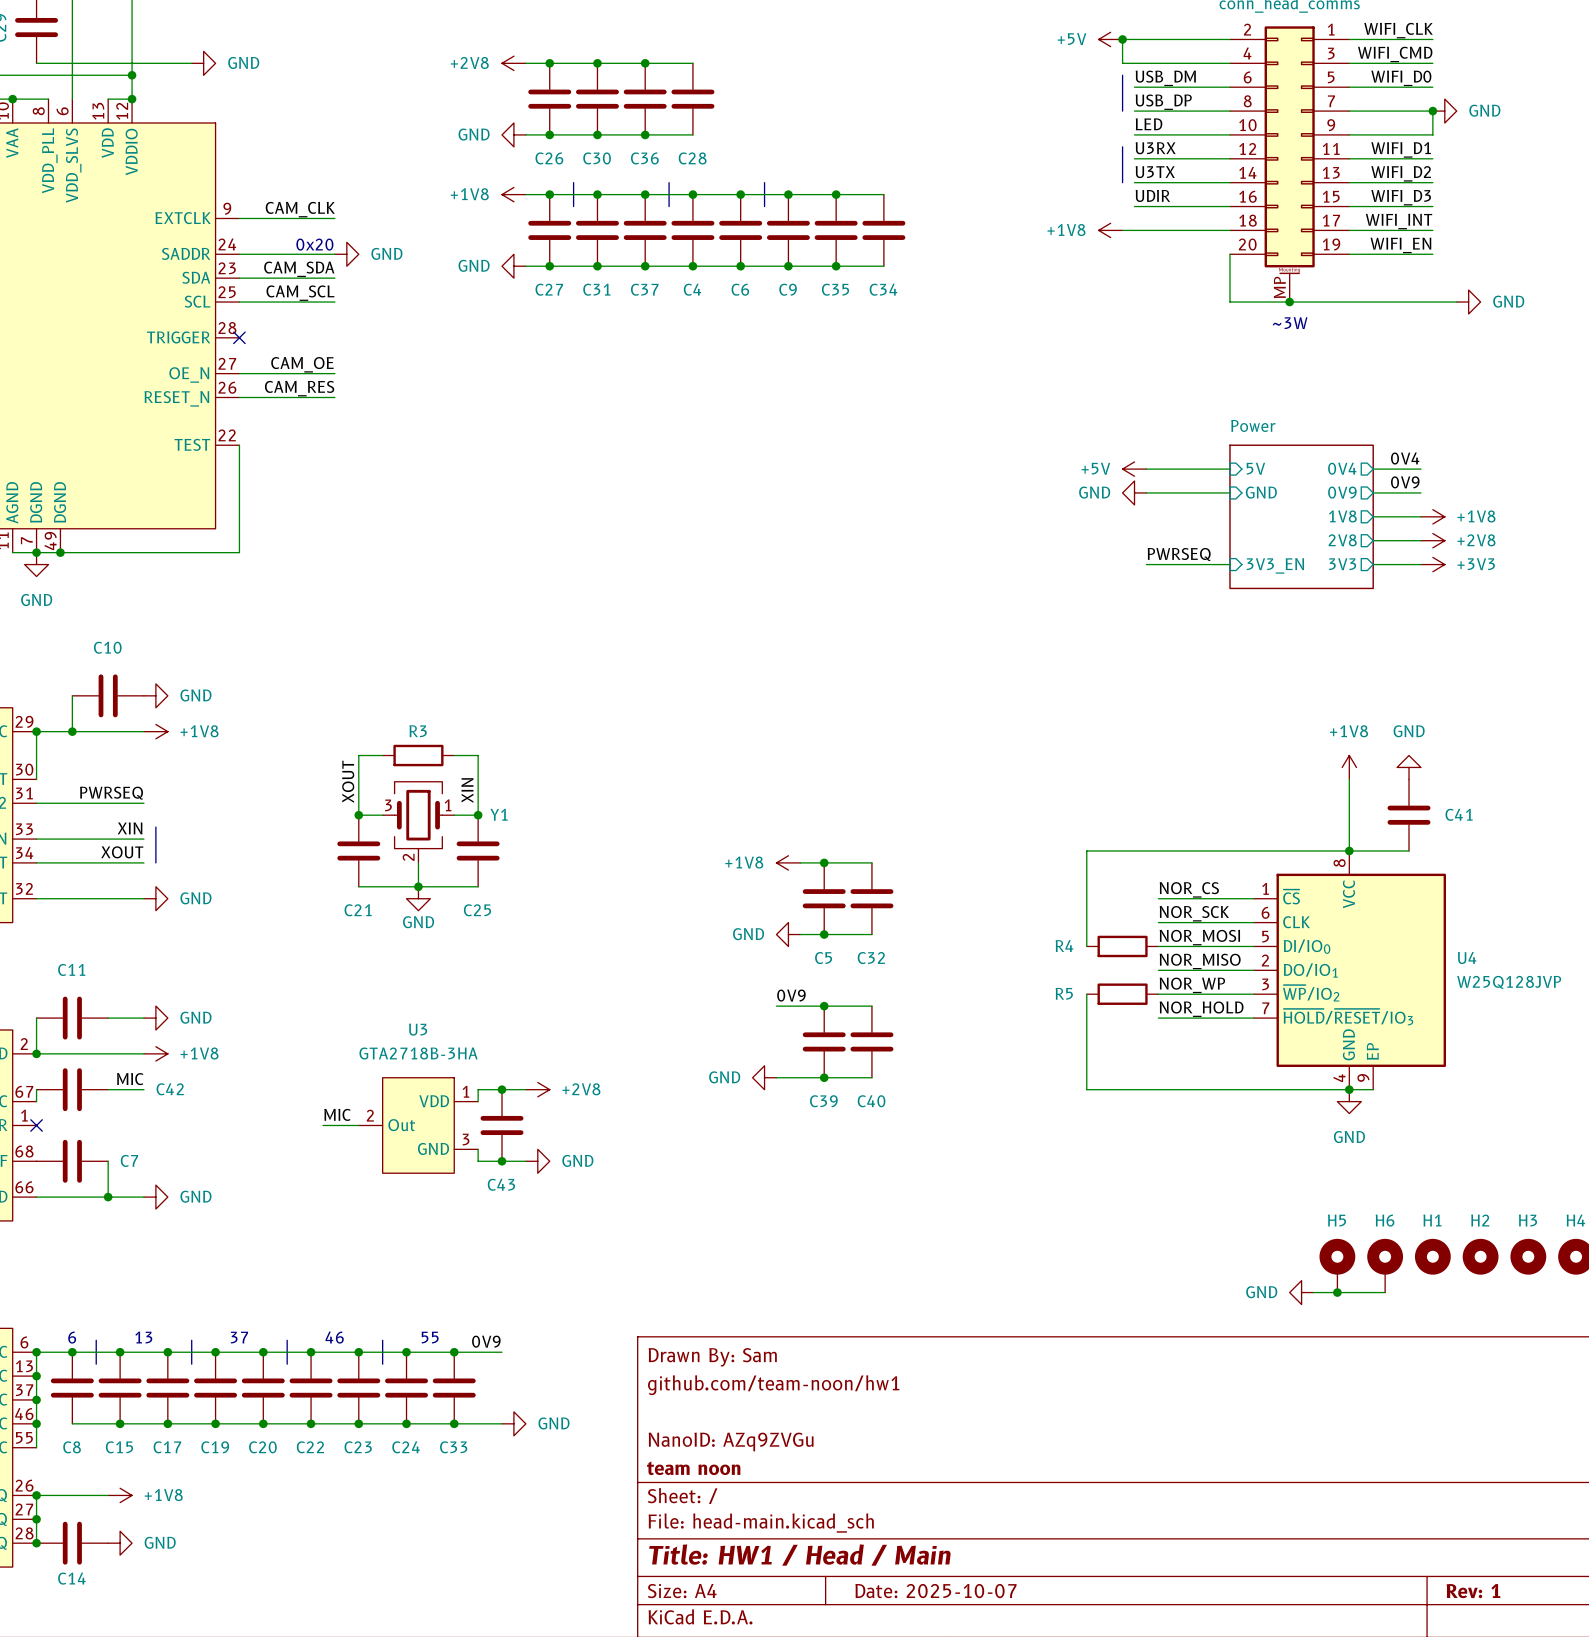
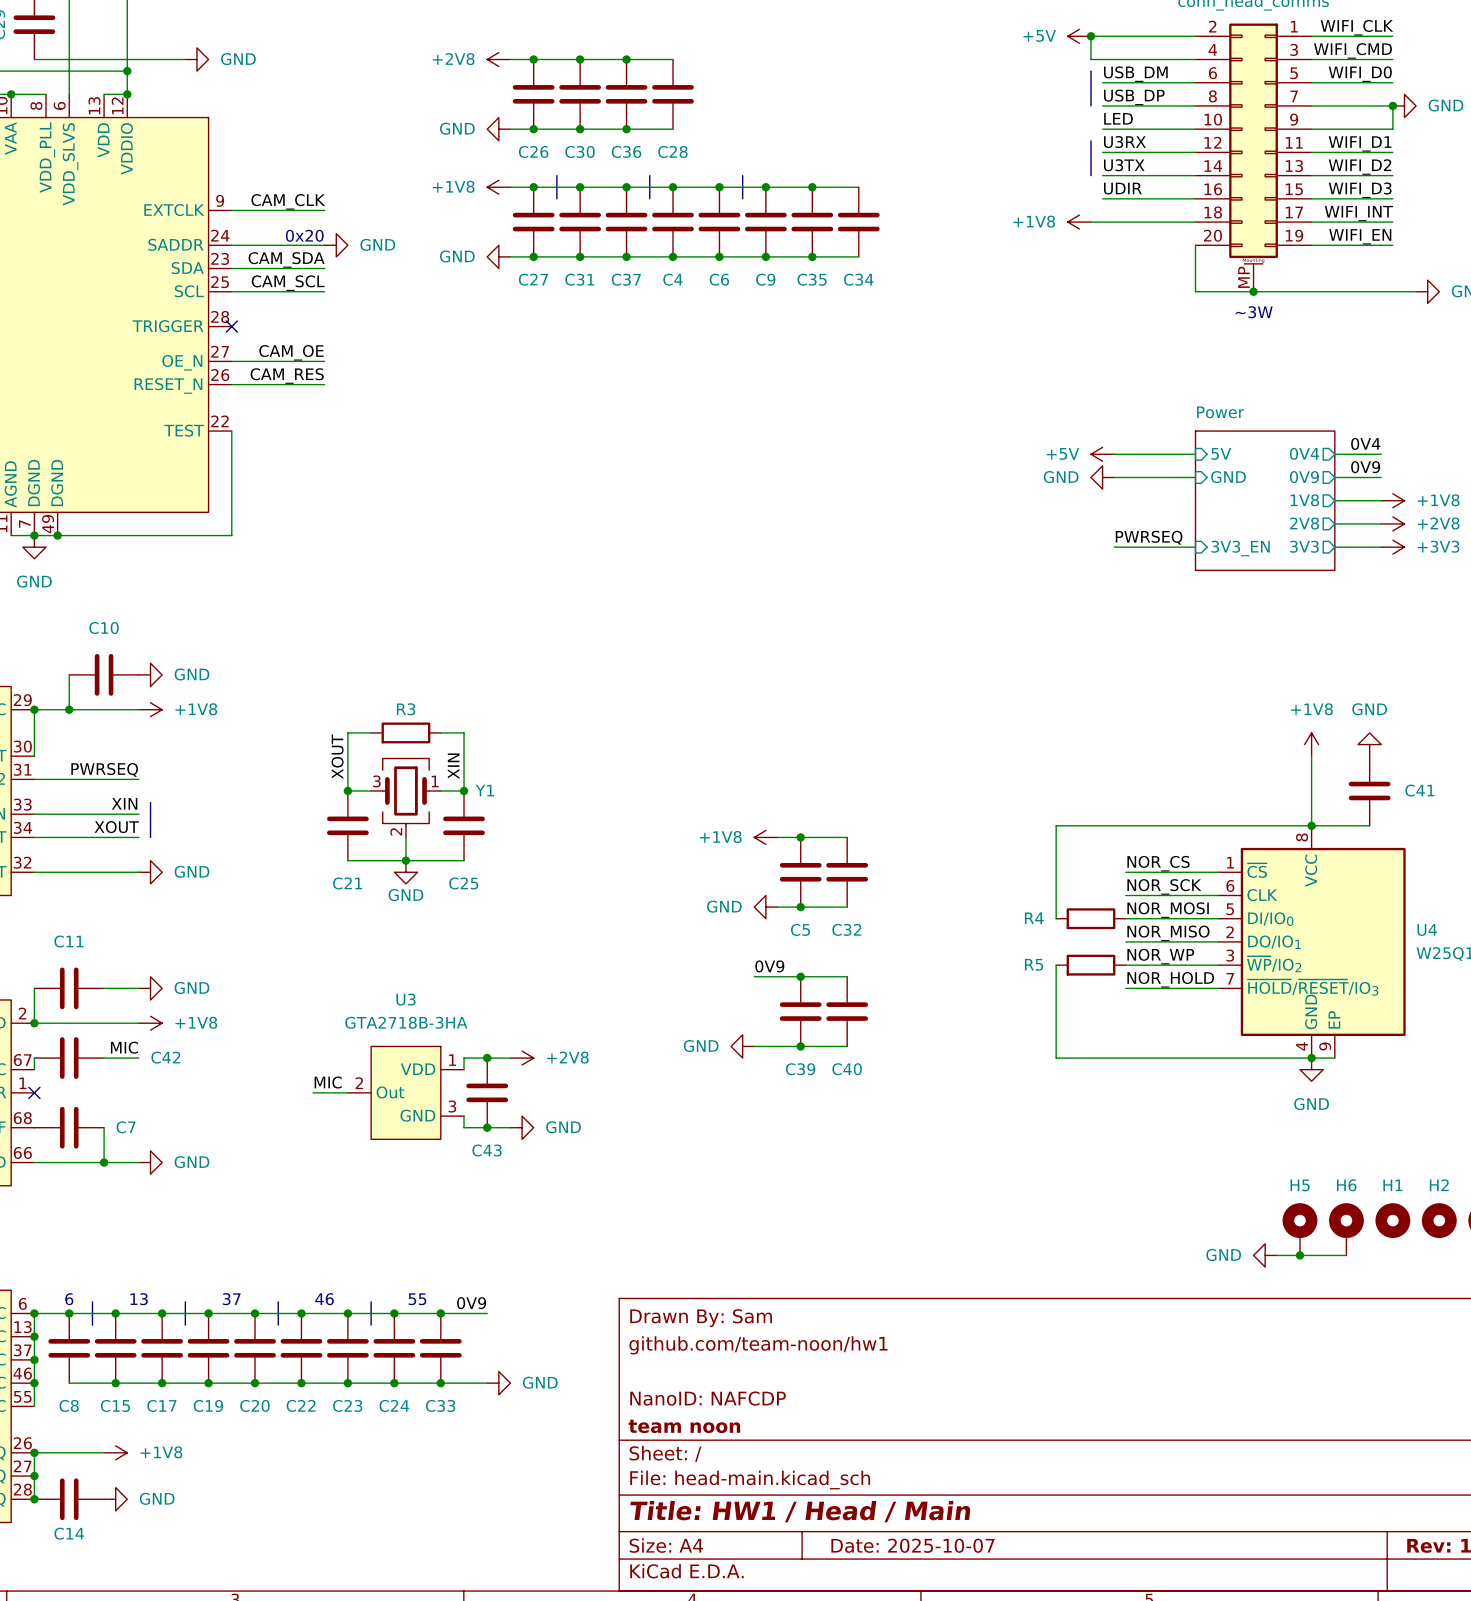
title block: NanoID: AZq9ZVGu (731, 1441) -> NanoID: NAFCDP (708, 1398)

